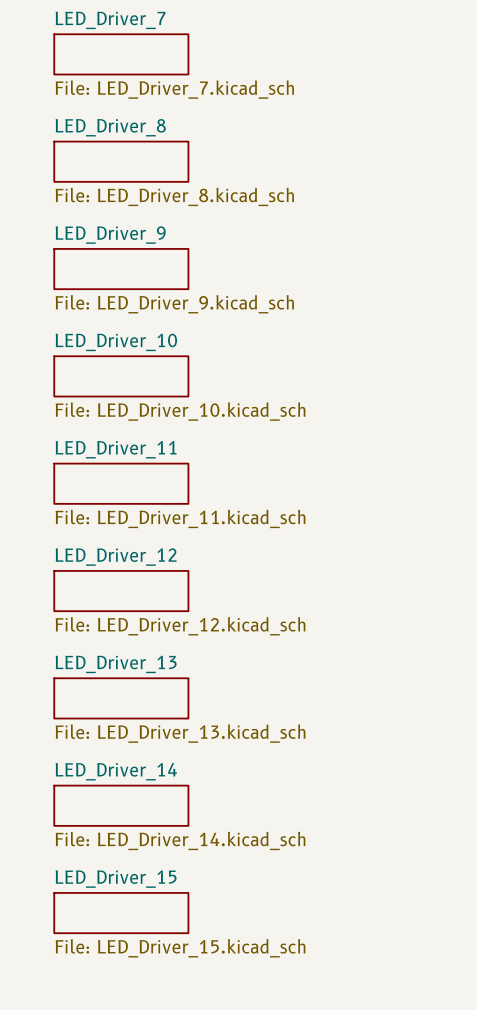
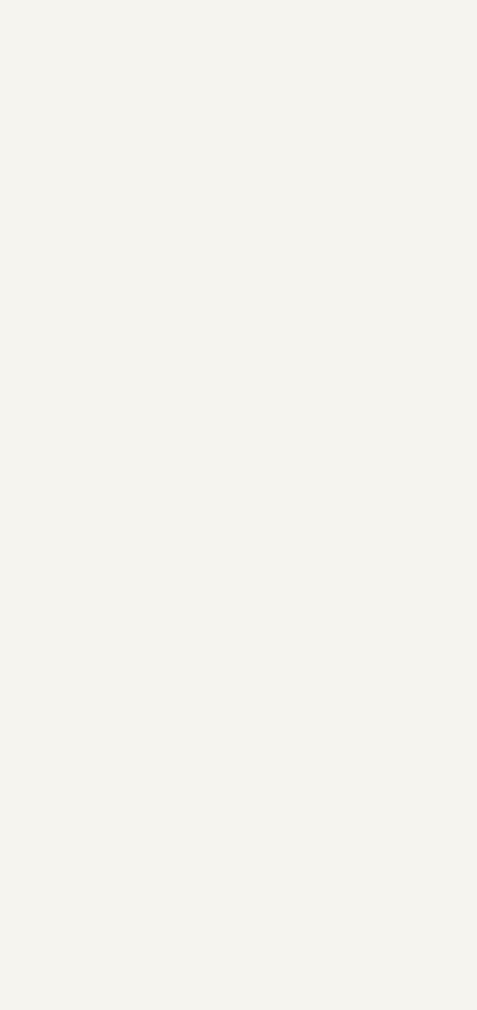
sheet LED_Driver_7: File: LED_Driver_7.kicad_sch (121, 54) -> none
sheet LED_Driver_8: File: LED_Driver_8.kicad_sch (121, 161) -> none
sheet LED_Driver_9: File: LED_Driver_9.kicad_sch (121, 269) -> none
sheet LED_Driver_10: File: LED_Driver_10.kicad_sch (121, 376) -> none
sheet LED_Driver_11: File: LED_Driver_11.kicad_sch (121, 483) -> none
sheet LED_Driver_12: File: LED_Driver_12.kicad_sch (121, 591) -> none
sheet LED_Driver_13: File: LED_Driver_13.kicad_sch (121, 698) -> none
sheet LED_Driver_14: File: LED_Driver_14.kicad_sch (121, 805) -> none
sheet LED_Driver_15: File: LED_Driver_15.kicad_sch (121, 913) -> none

